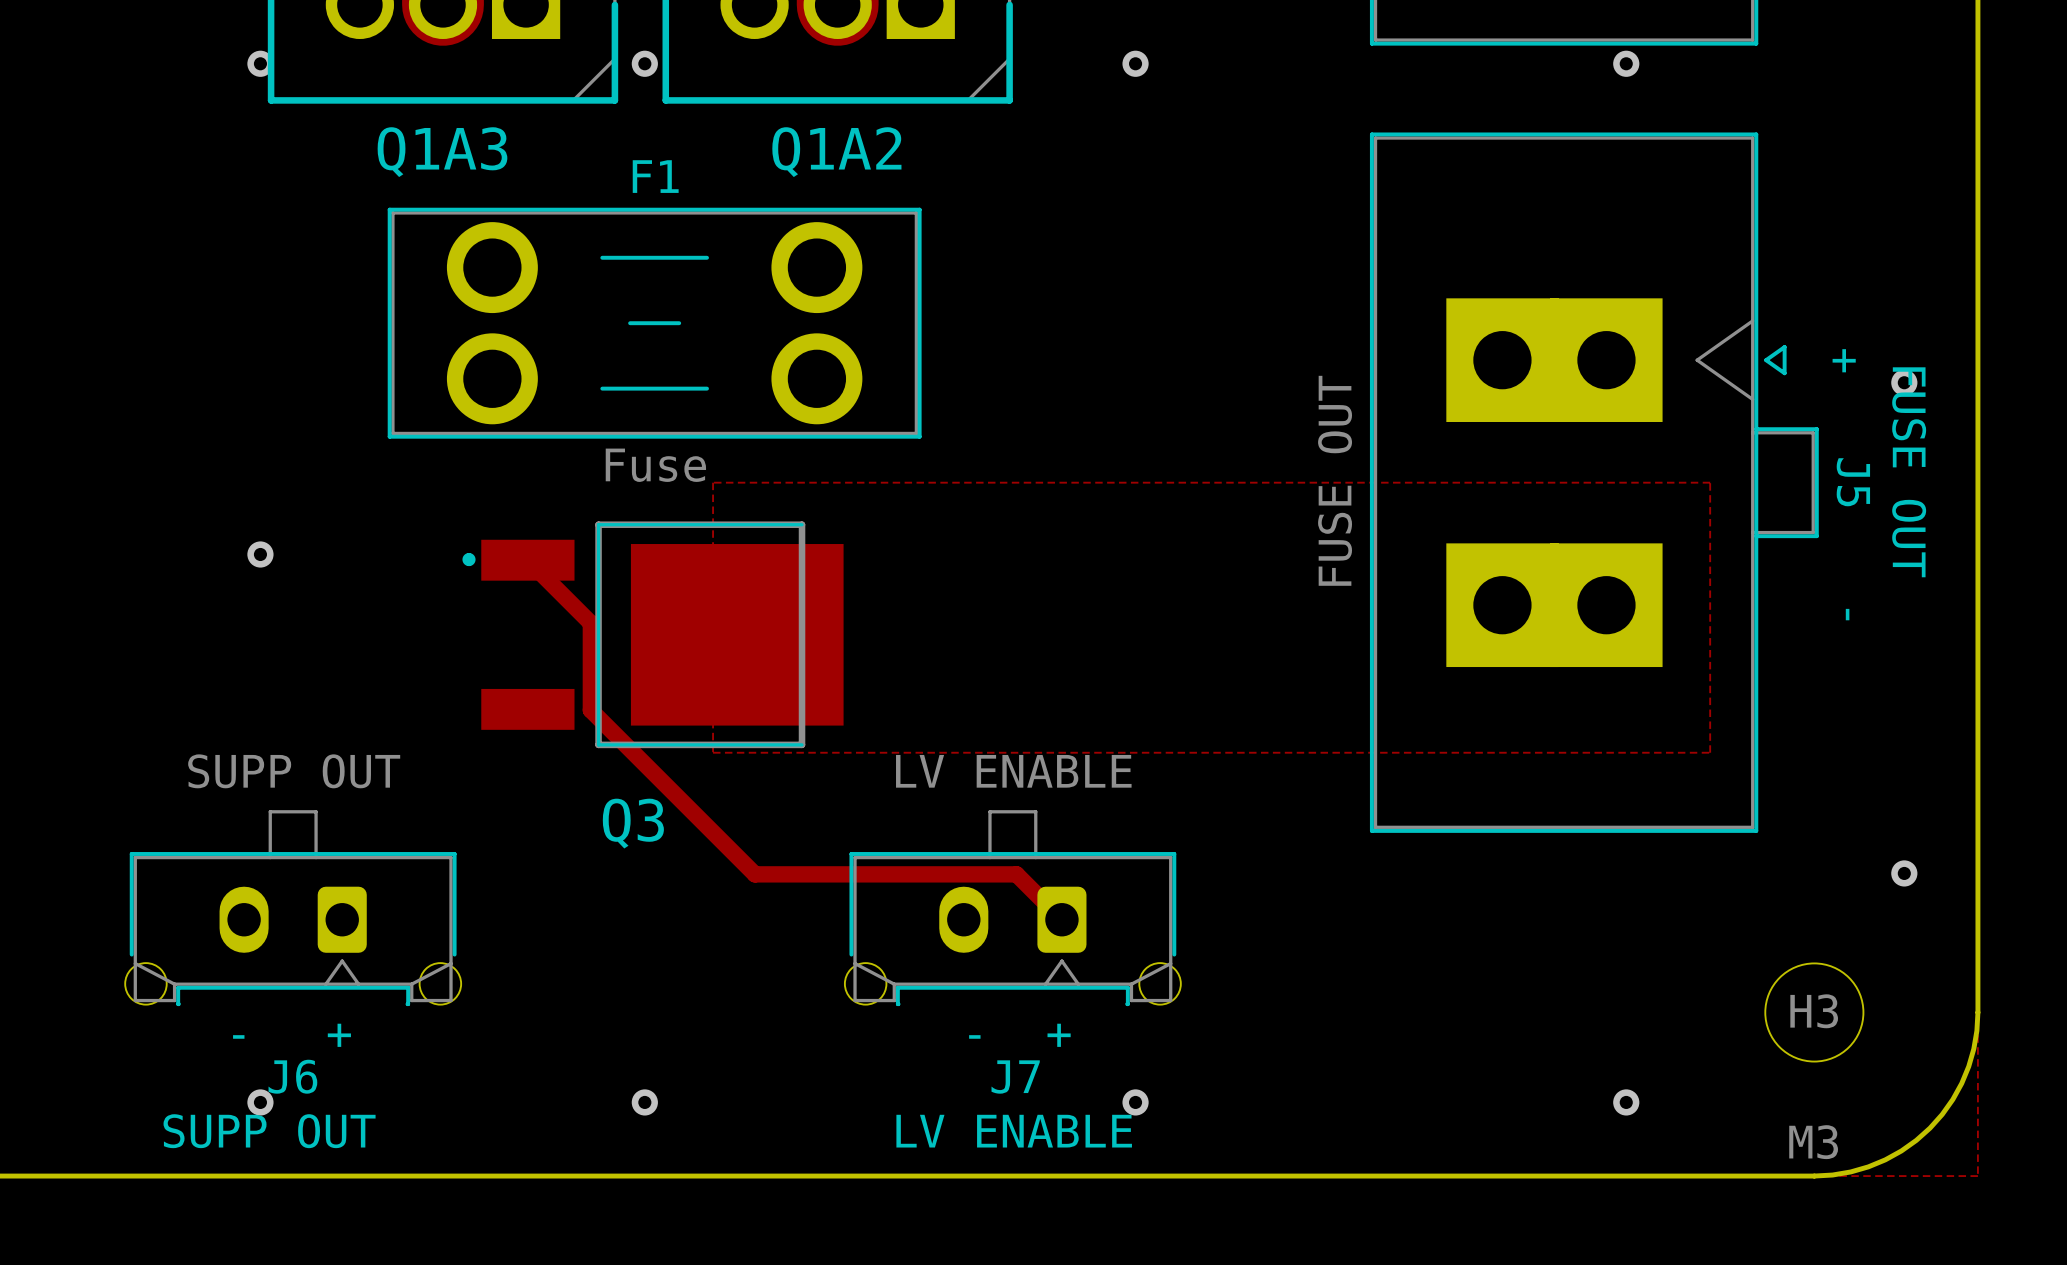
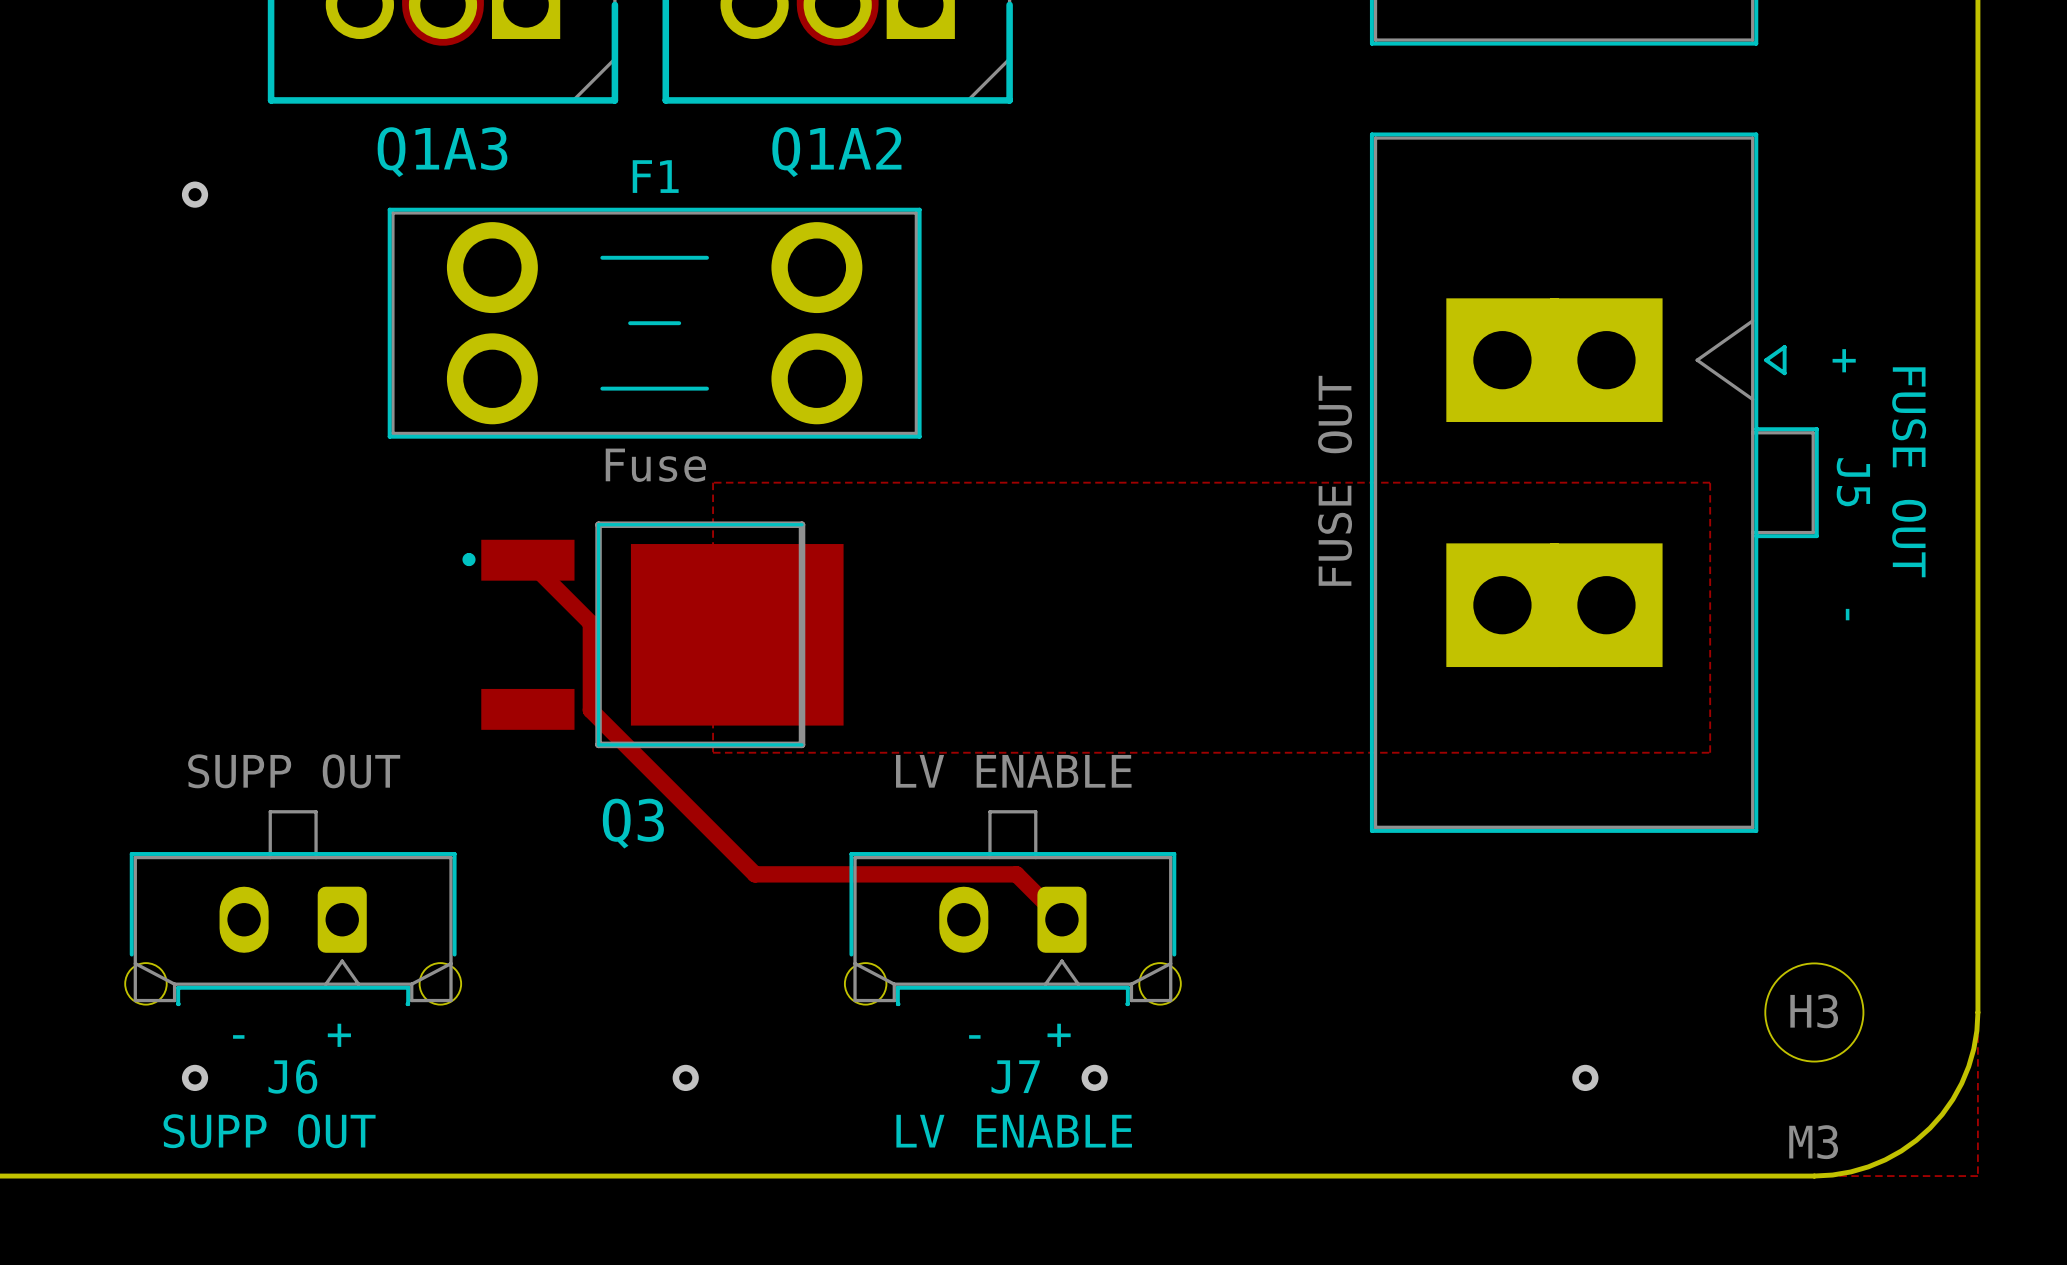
via position: (260, 63) -> (195, 194)
via: (644, 63) -> none
via: (1135, 63) -> none
via: (1626, 63) -> none
via: (1904, 382) -> none
via: (260, 554) -> none
via: (1904, 873) -> none
via position: (260, 1102) -> (195, 1077)
via position: (644, 1102) -> (685, 1077)
via position: (1135, 1102) -> (1094, 1077)
via position: (1626, 1102) -> (1585, 1077)

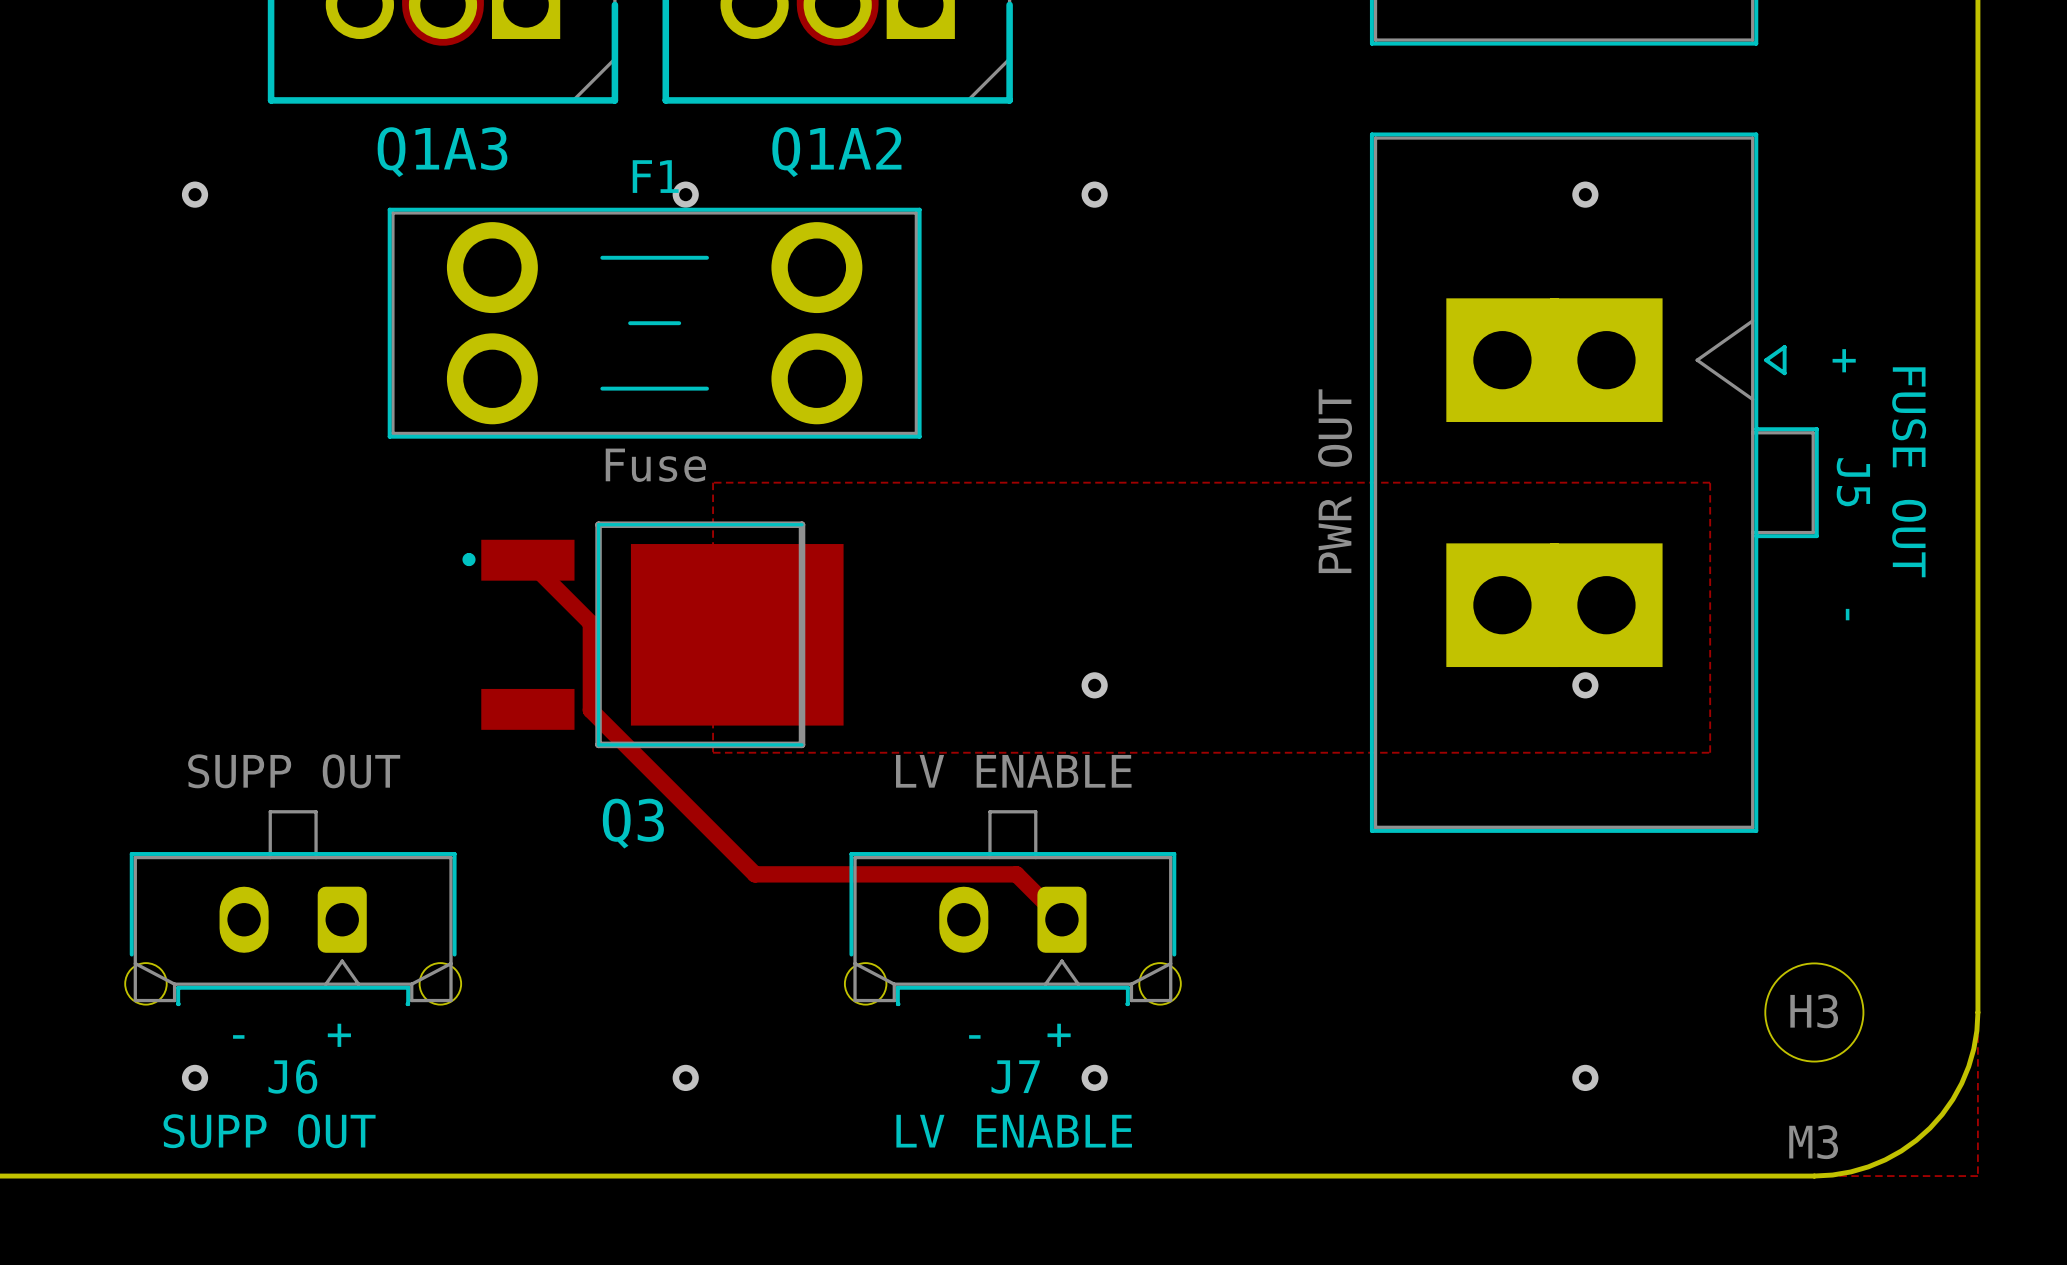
via: none -> (685, 194)
via: none -> (1094, 194)
via: none -> (1585, 194)
J5 value: FUSE OUT (1335, 480) -> PWR OUT (1335, 481)
via: none -> (1094, 685)
via: none -> (1585, 685)

